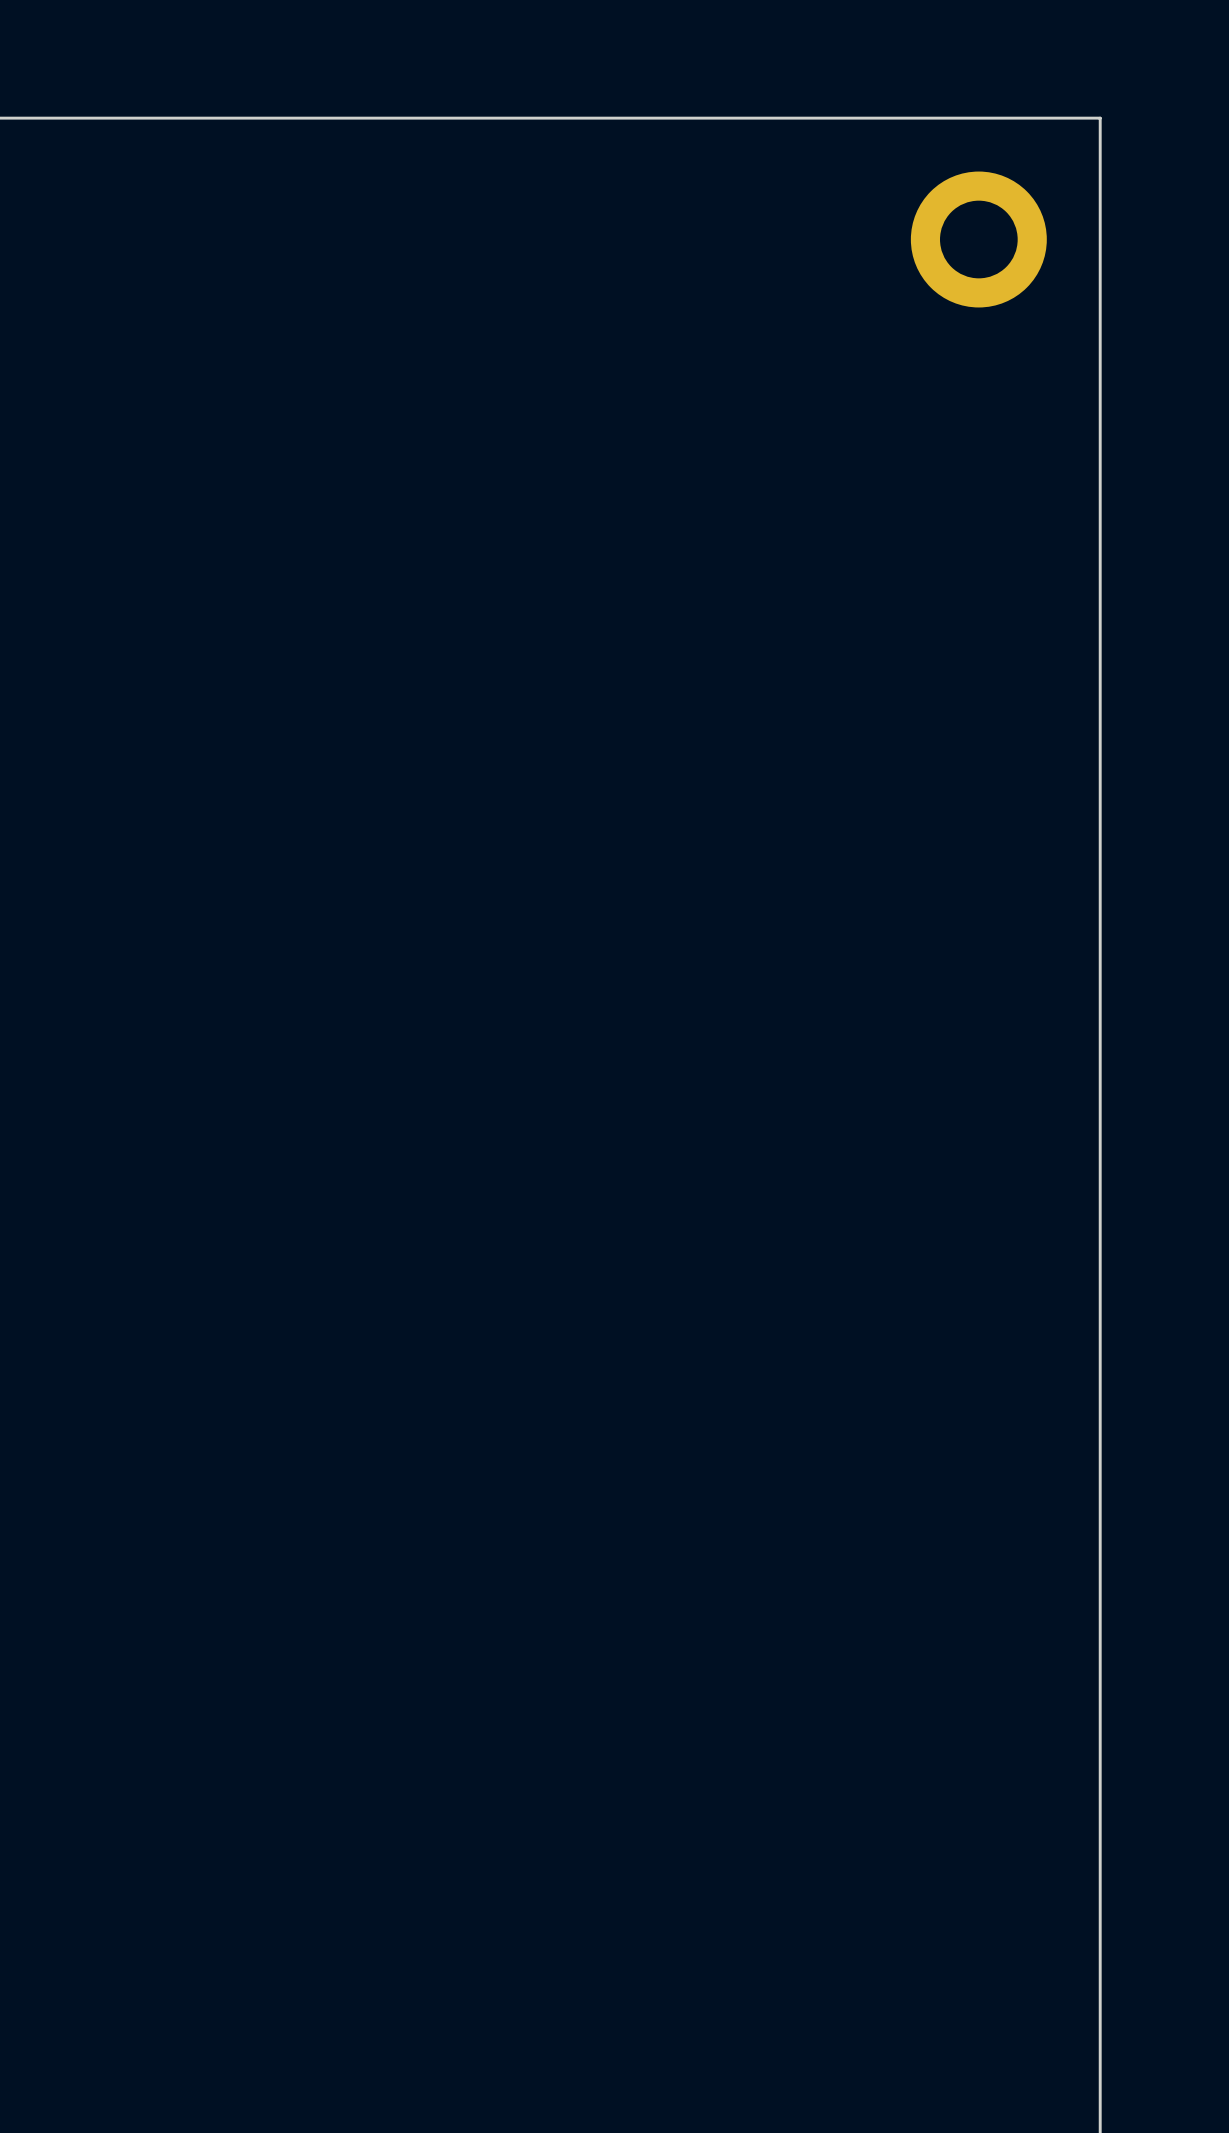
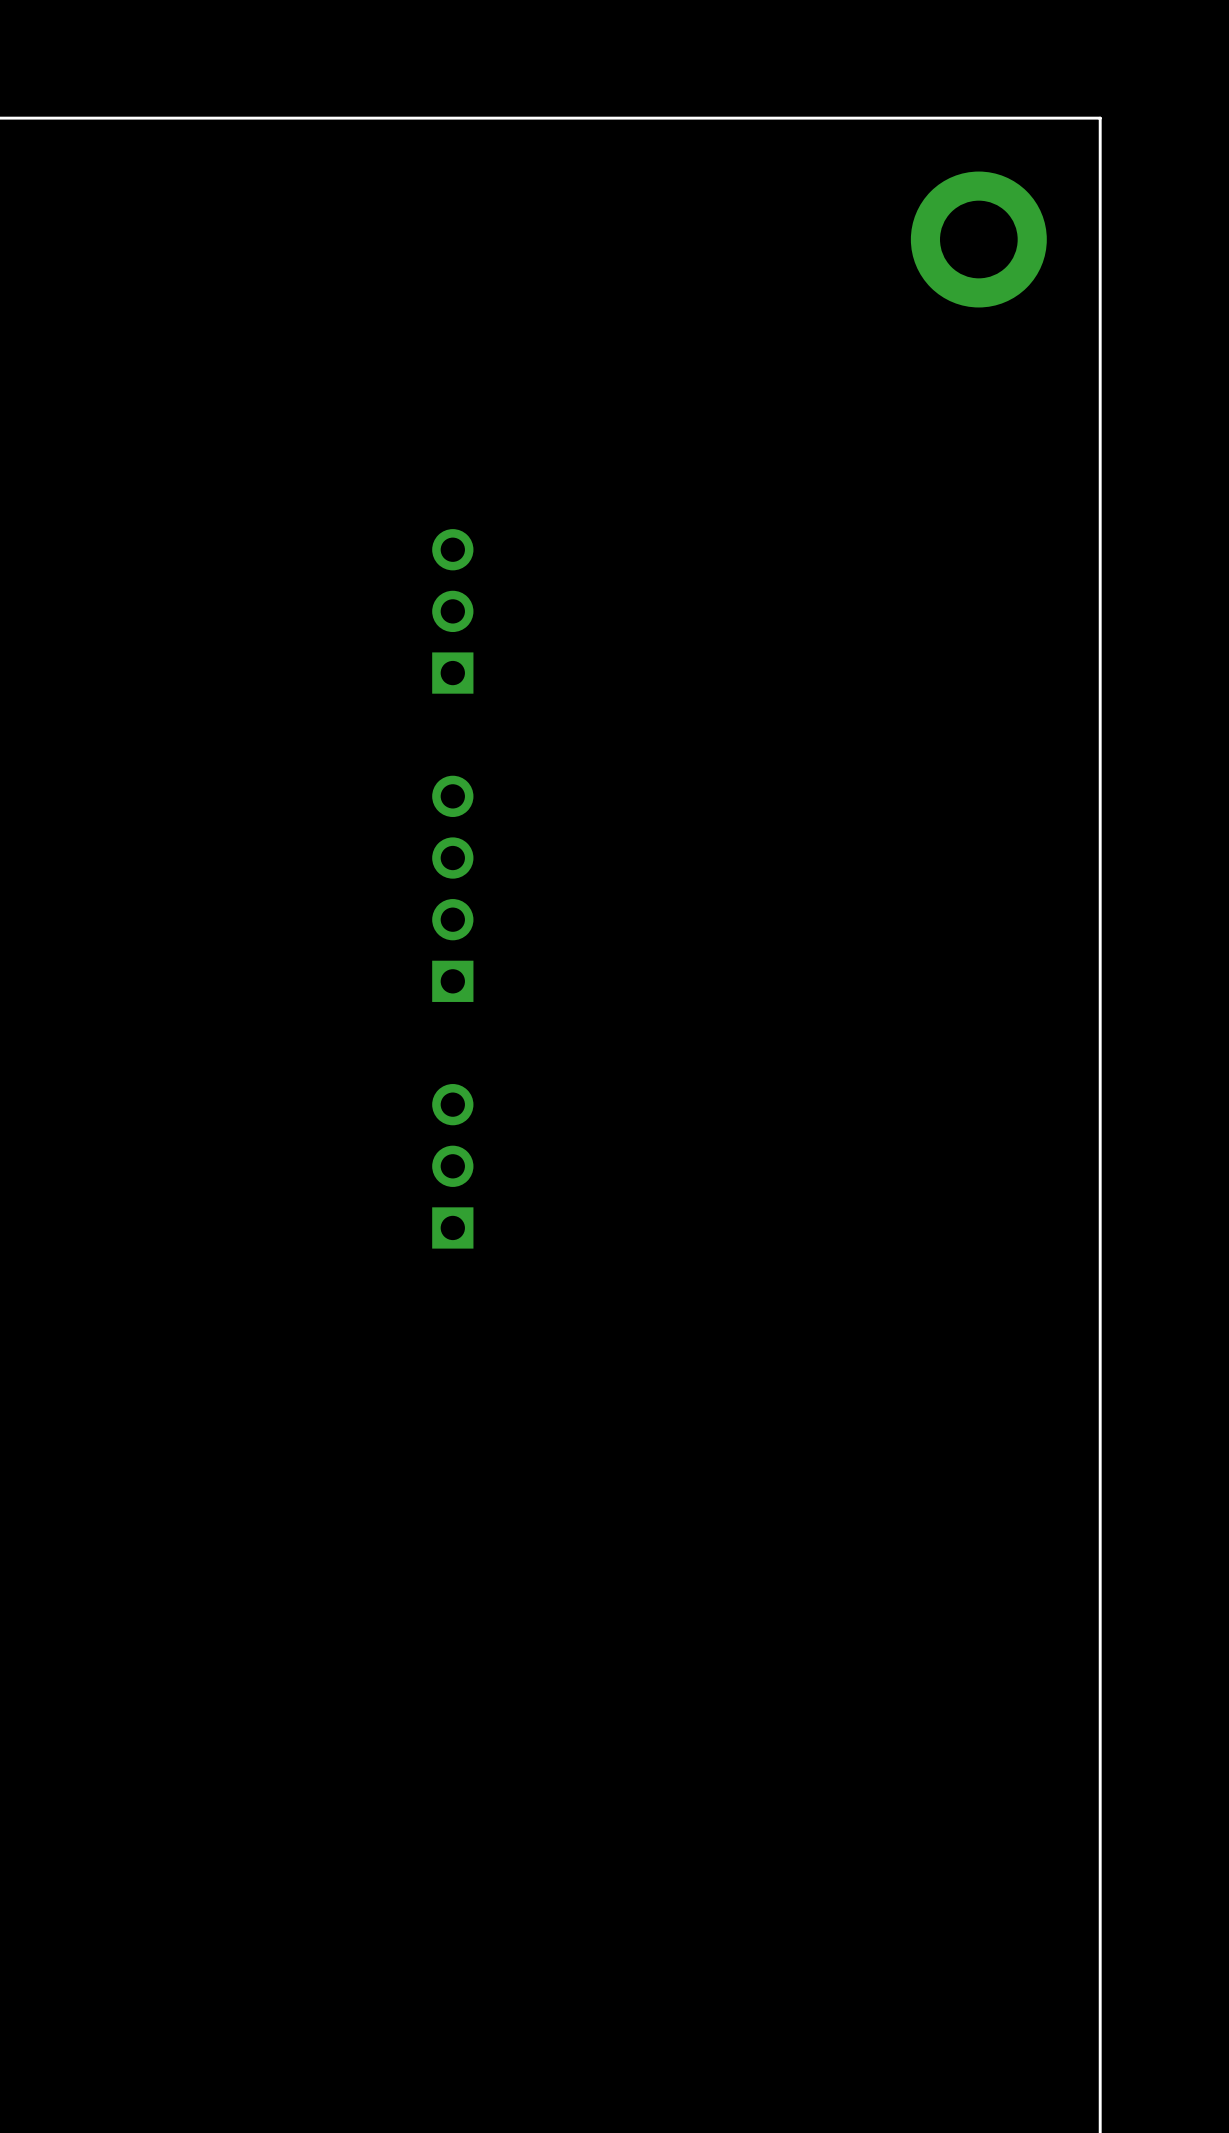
part: none -> (452, 611)
part: none -> (452, 888)
part: none -> (452, 1166)

